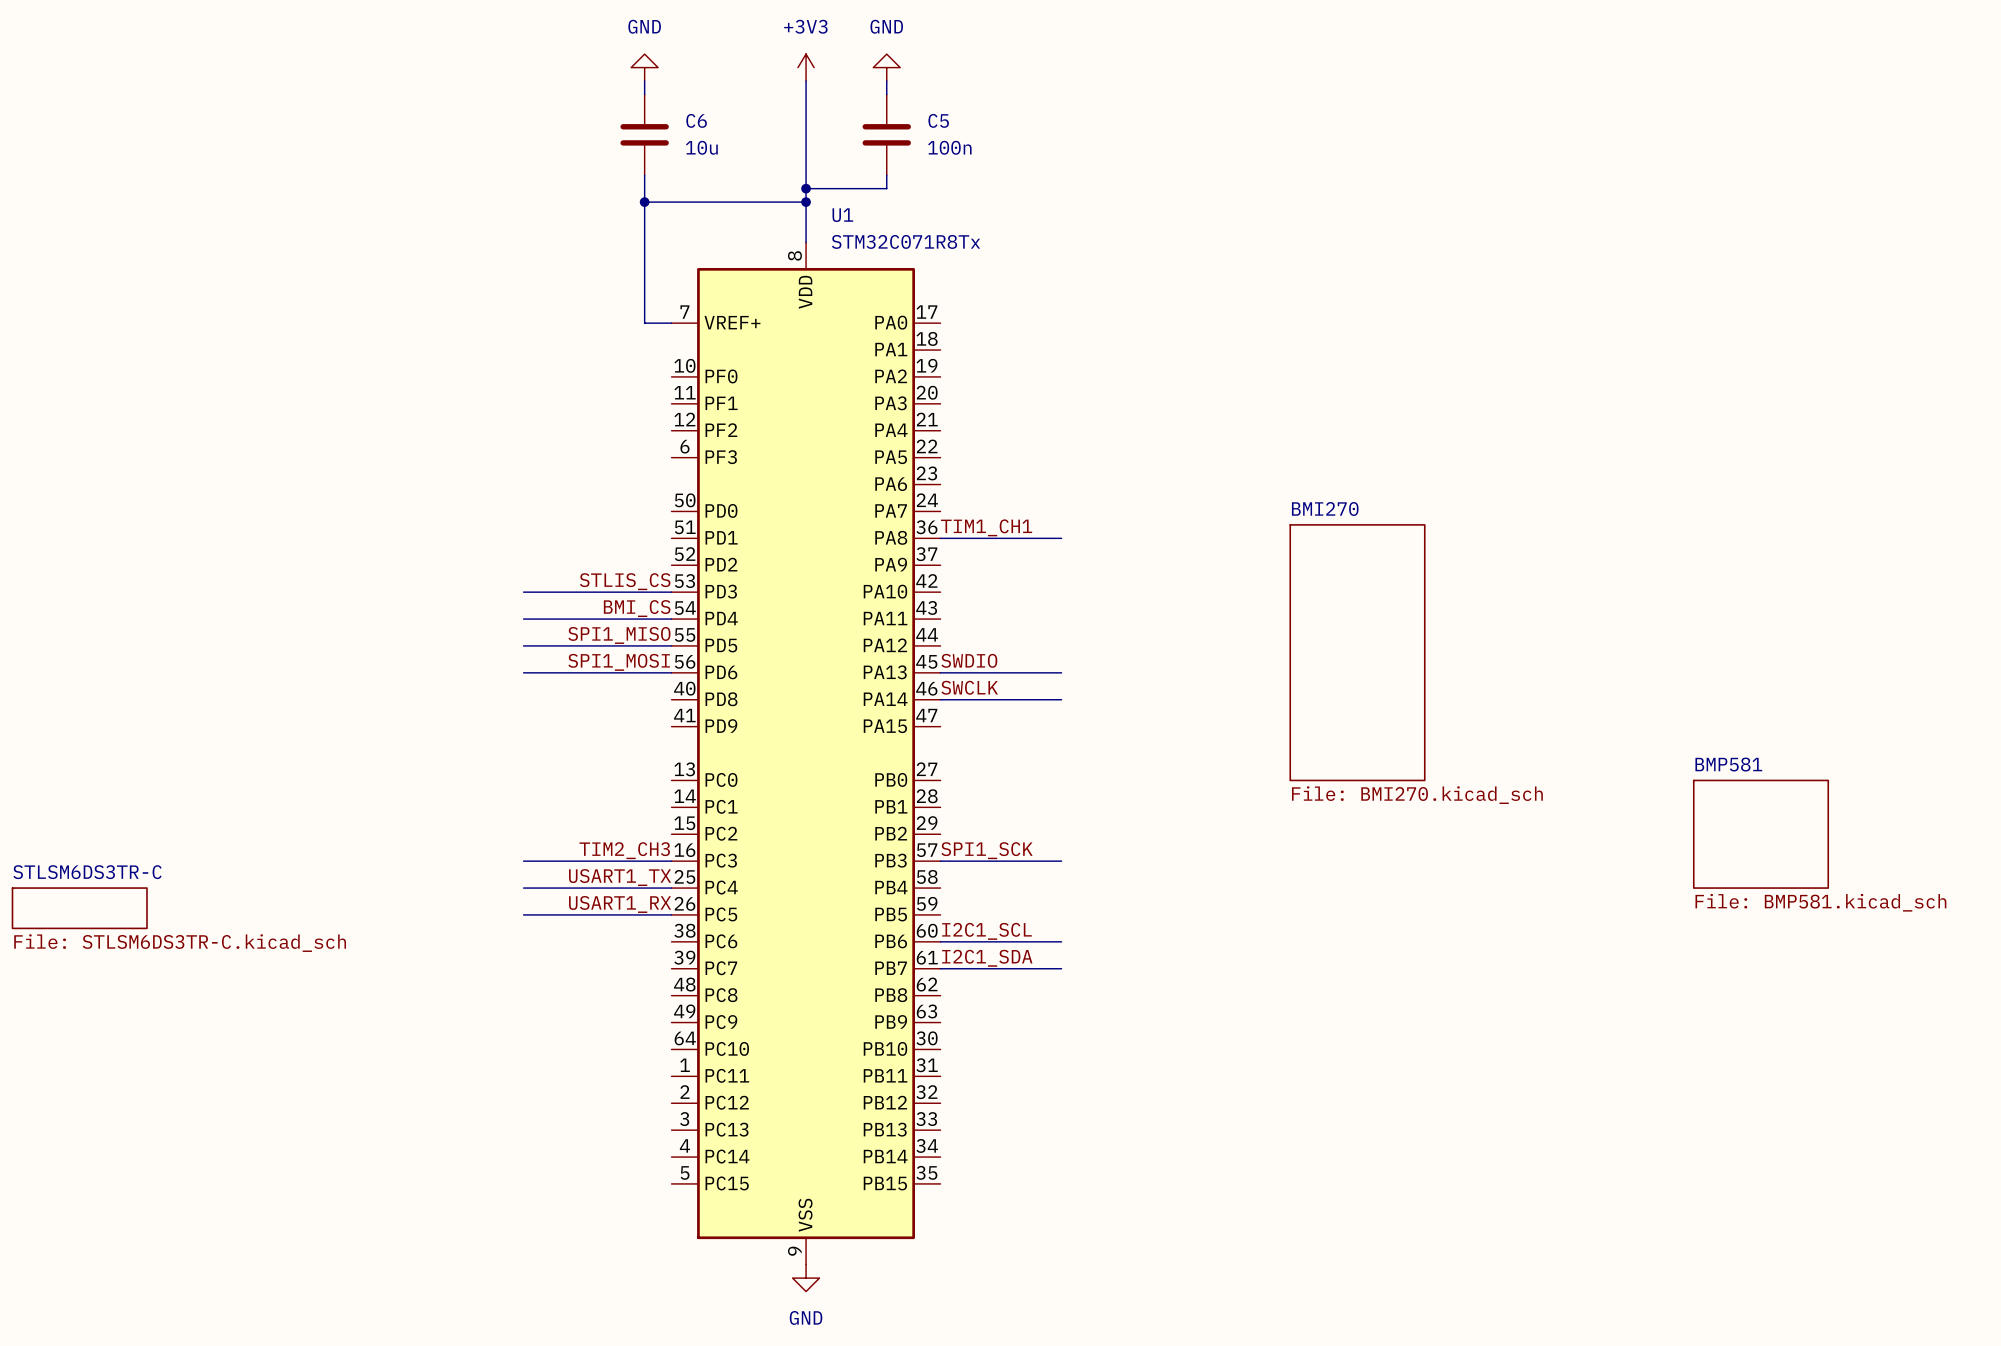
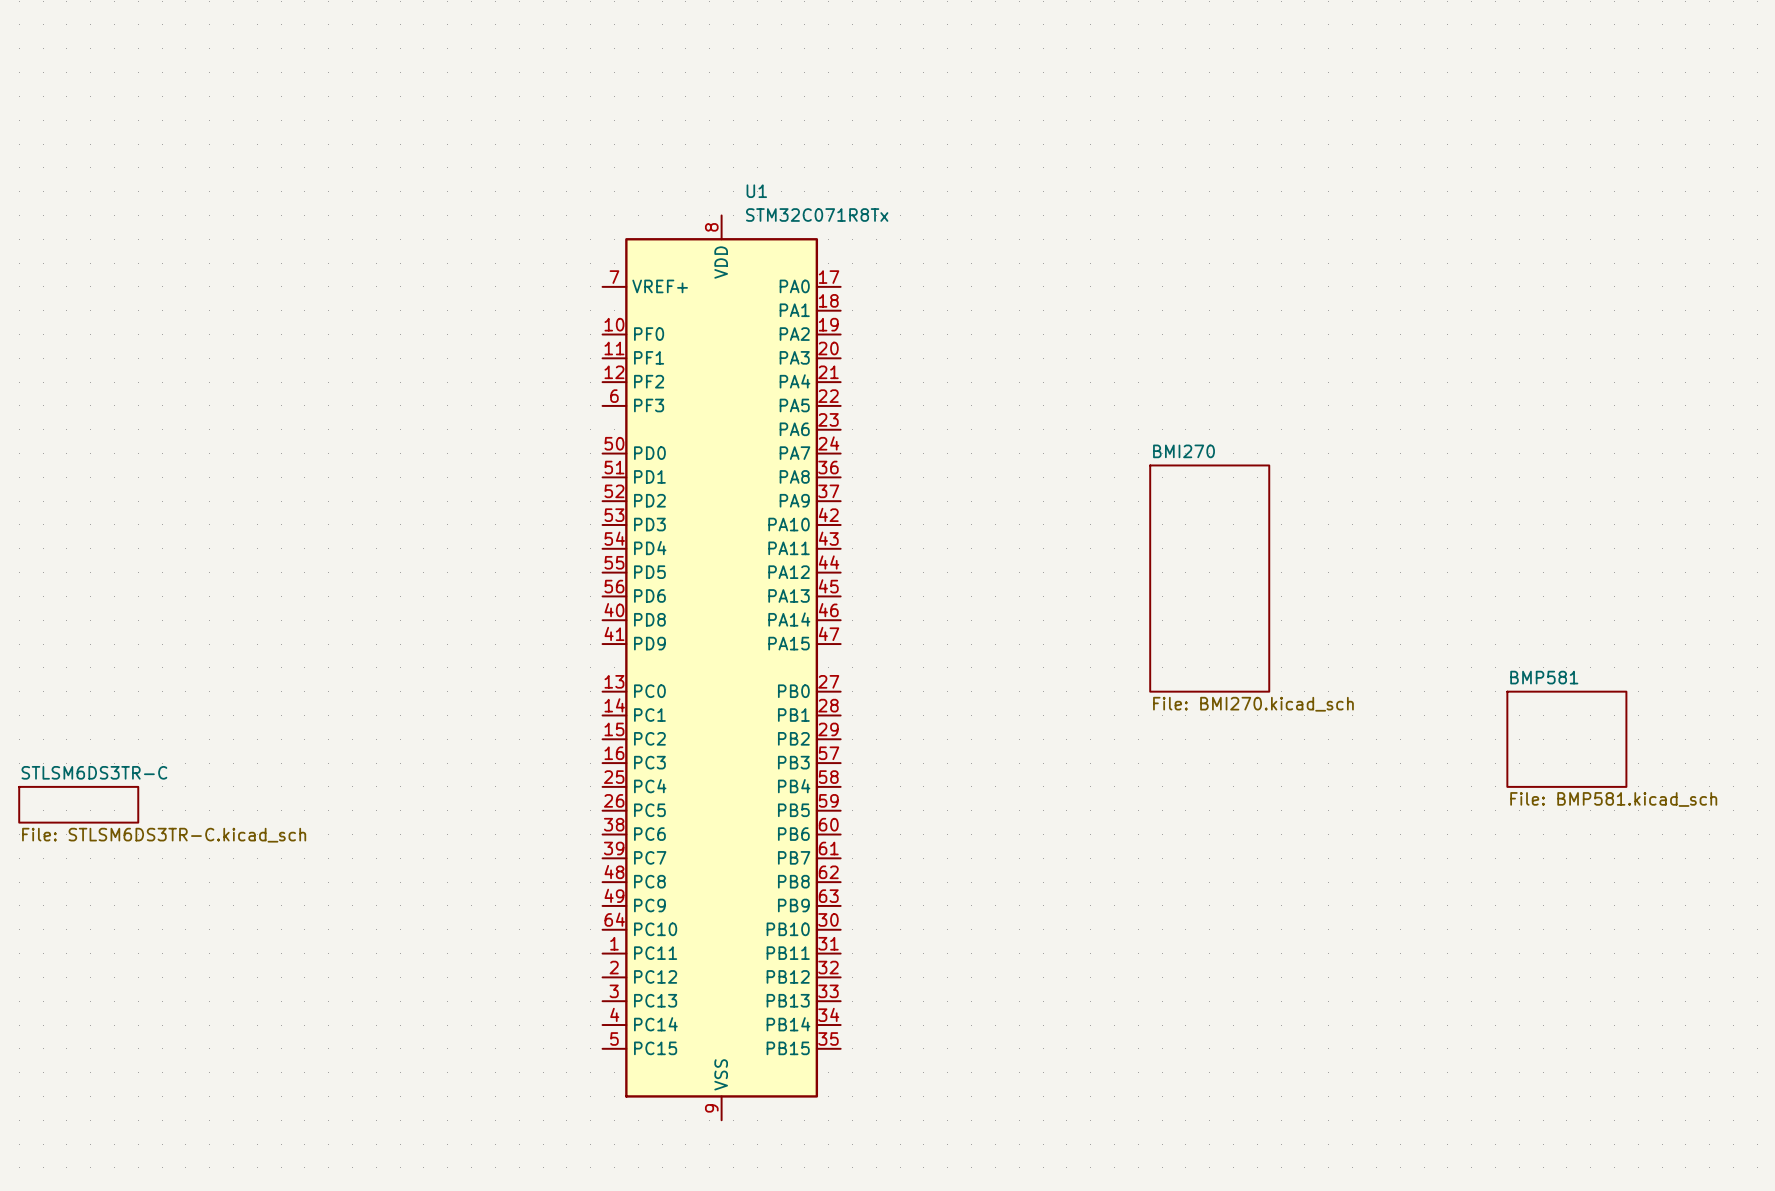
power symbol: GND (644, 67) -> none
power symbol: +3V3 (806, 67) -> none
power symbol: GND (886, 67) -> none
wire: (644, 81) (644, 94) -> none
wire: (806, 81) (806, 242) -> none
wire: (886, 81) (886, 94) -> none
C6: 10u (644, 134) -> none
C5: 100n (886, 134) -> none
wire: (644, 175) (644, 323) (671, 323) -> none
wire: (886, 175) (886, 188) (806, 188) -> none
junction: (806, 188) -> none
wire: (644, 202) (806, 202) -> none
junction: (644, 202) -> none
junction: (806, 202) -> none
label: TIM1_CH1 (986, 527) -> none
wire: (940, 538) (1061, 538) -> none
label: STLIS_CS (625, 581) -> none
wire: (523, 592) (671, 592) -> none
label: BMI_CS (637, 608) -> none
wire: (523, 619) (671, 619) -> none
label: SPI1_MISO (619, 635) -> none
wire: (523, 645) (671, 645) -> none
label: SWDIO (969, 660) -> none
label: SPI1_MOSI (619, 662) -> none
wire: (523, 672) (671, 672) -> none
wire: (940, 672) (1061, 672) -> none
label: SWCLK (969, 687) -> none
wire: (940, 699) (1061, 699) -> none
label: TIM2_CH3 (624, 850) -> none
label: SPI1_SCK (987, 850) -> none
wire: (523, 861) (671, 861) -> none
wire: (940, 861) (1061, 861) -> none
label: USART1_TX (620, 877) -> none
wire: (523, 888) (671, 888) -> none
label: USART1_RX (620, 904) -> none
wire: (523, 914) (671, 914) -> none
label: I2C1_SCL (986, 931) -> none
wire: (940, 941) (1061, 941) -> none
label: I2C1_SDA (987, 958) -> none
wire: (940, 968) (1061, 968) -> none
power symbol: GND (806, 1278) -> none

